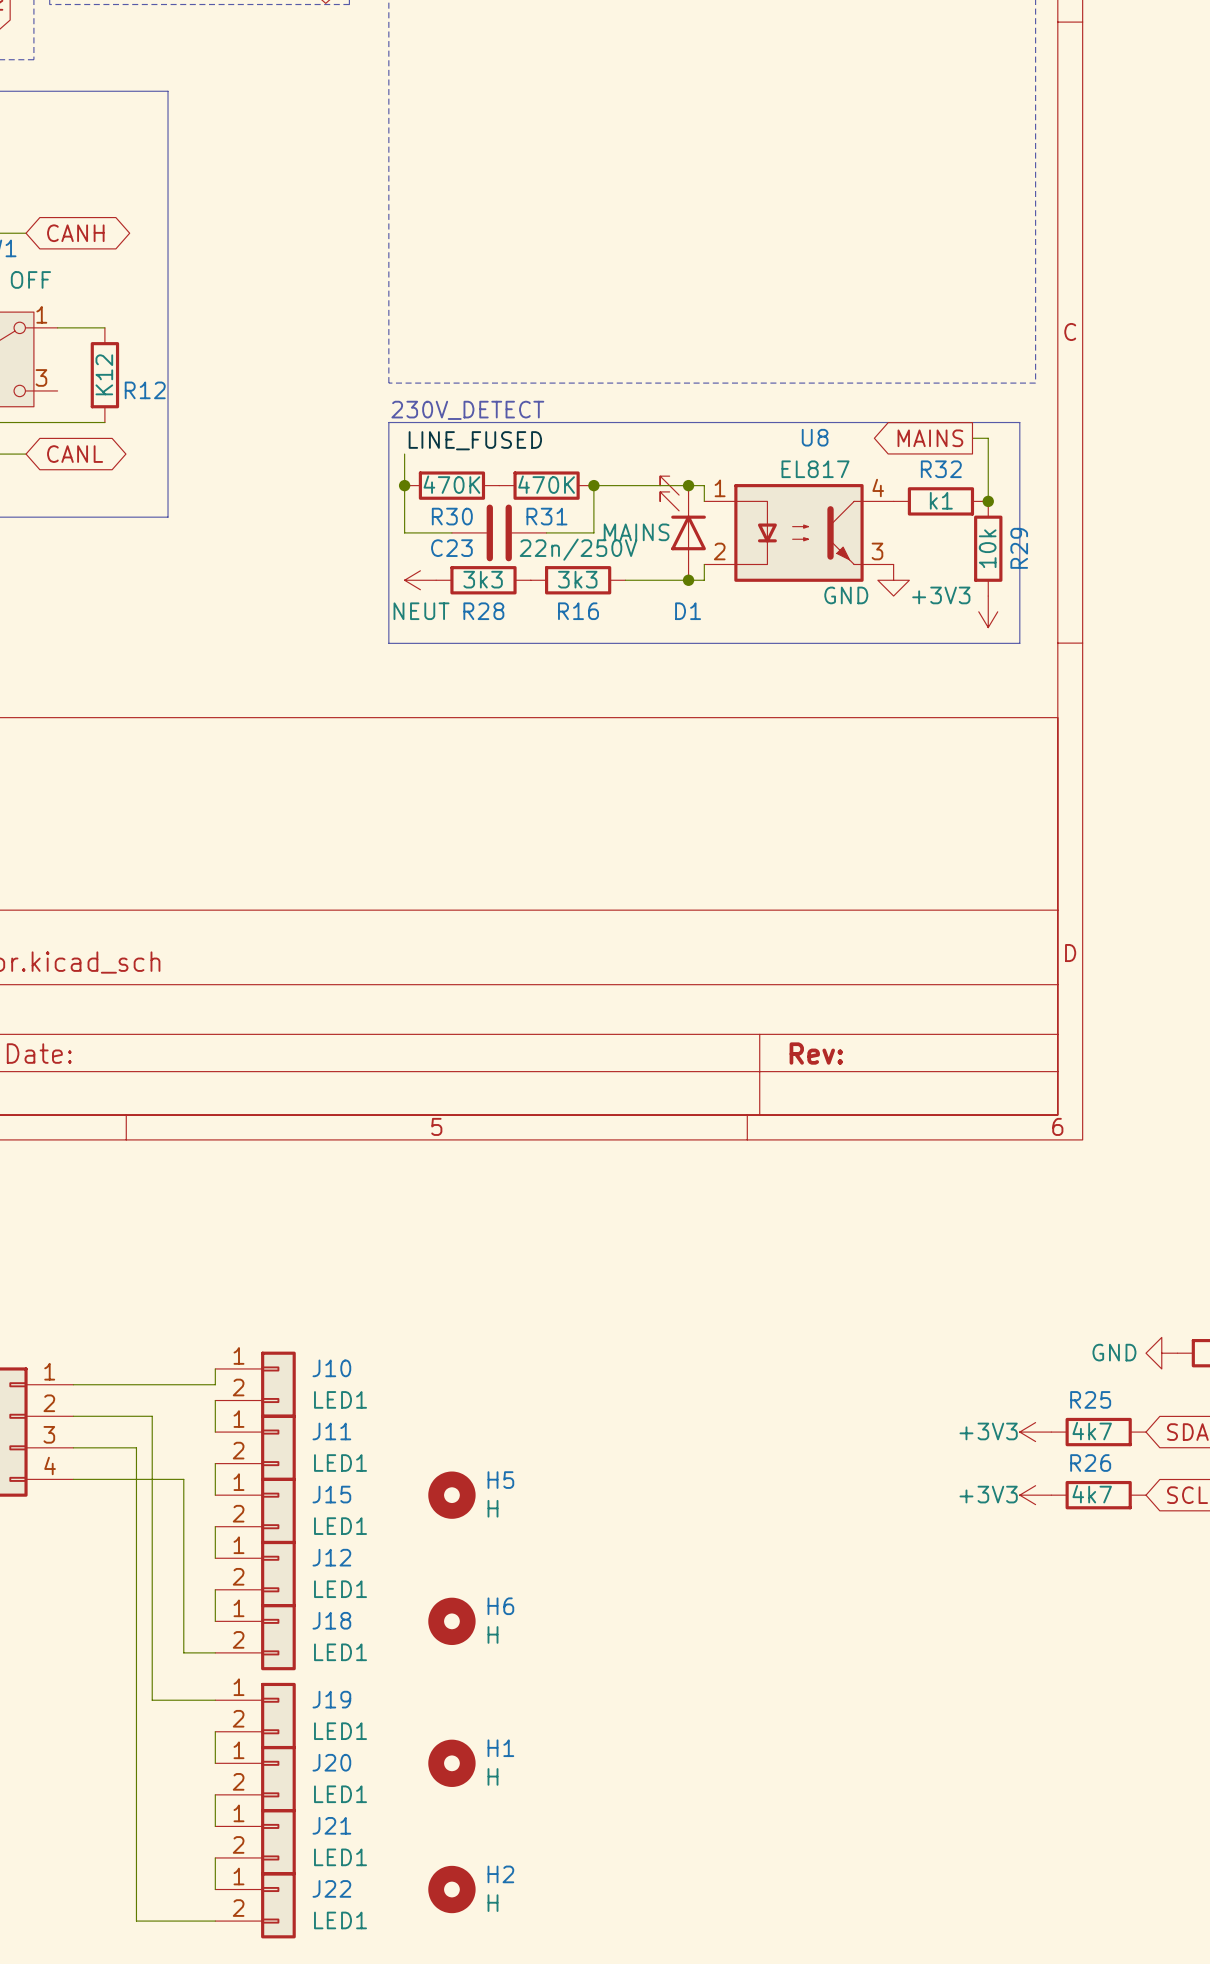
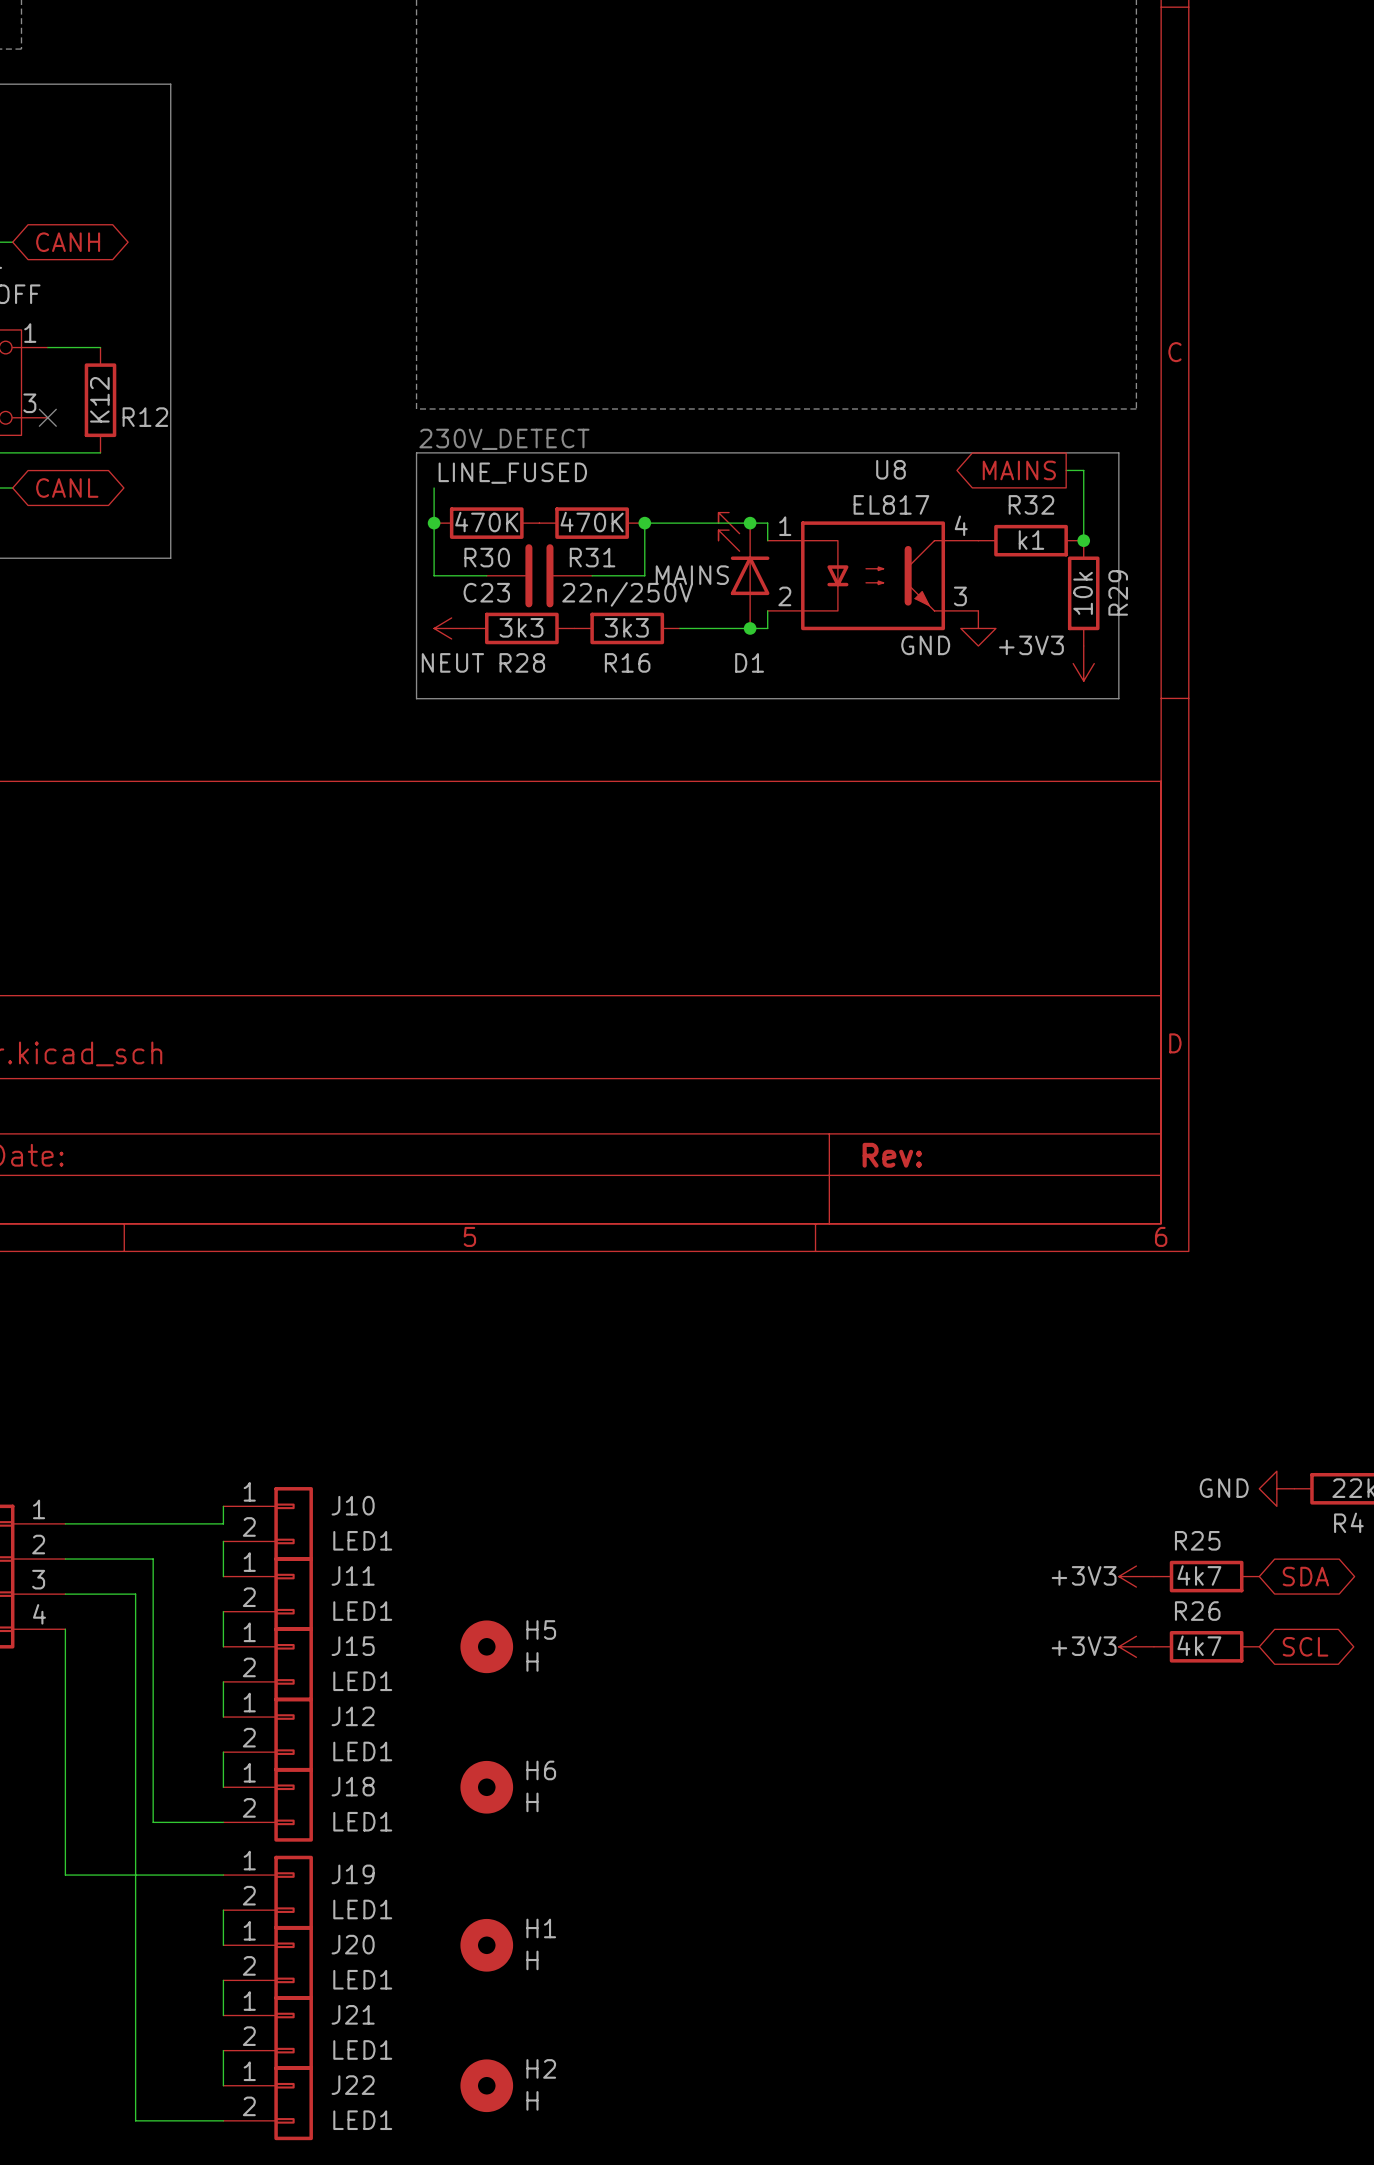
no-connect mark: none -> (47, 417)
wire: (73, 1479) (183, 1479) (183, 1652) -> (65, 1629) (65, 1875) (153, 1875)
wire: (152, 1652) (152, 1700) -> (153, 1822) (188, 1822)

